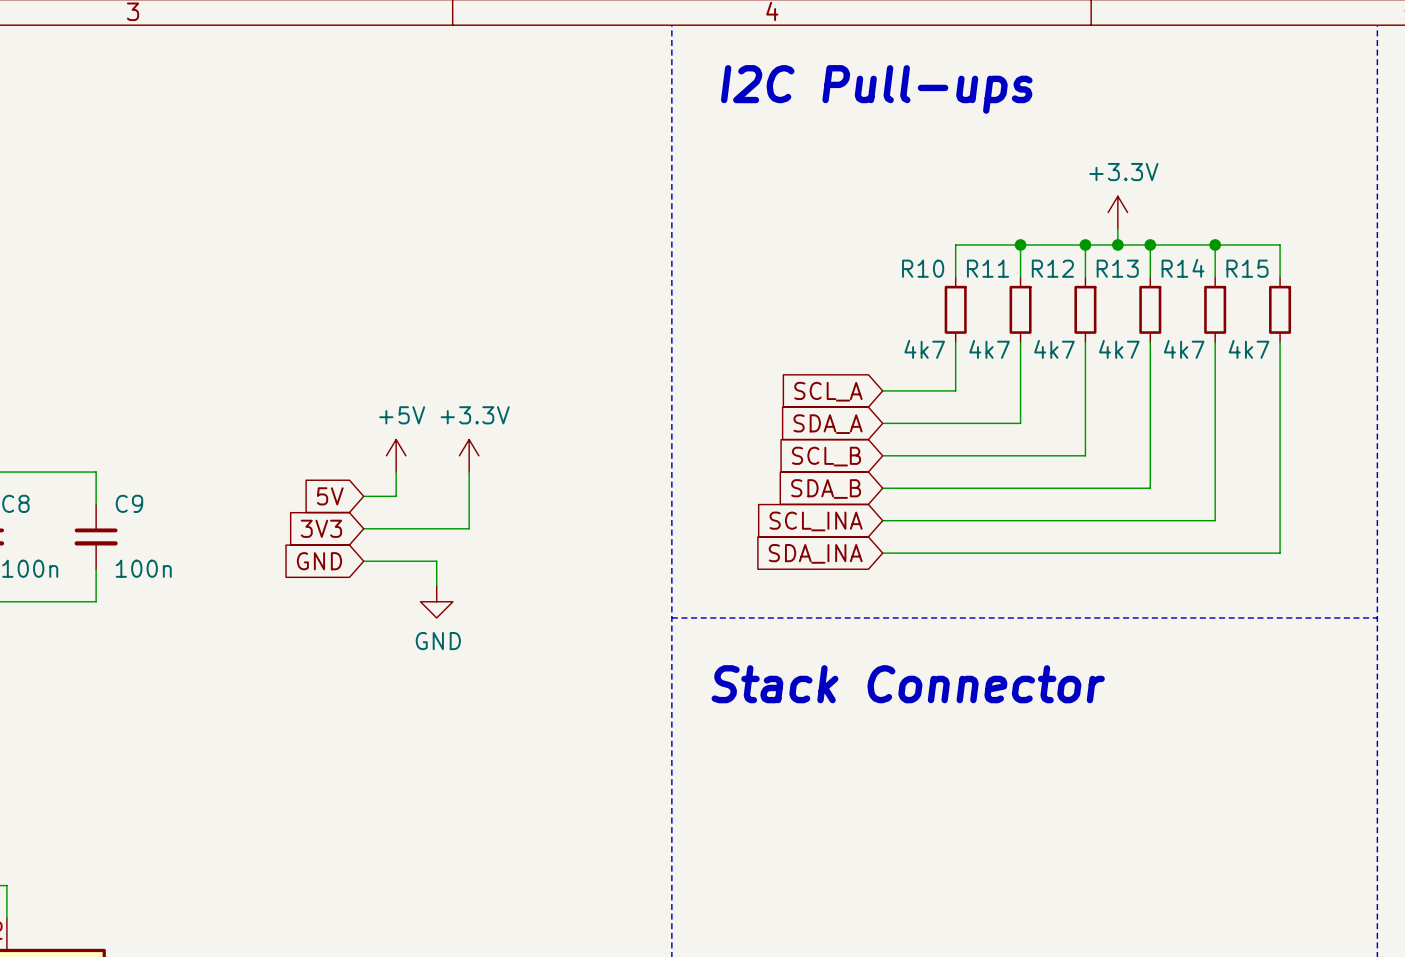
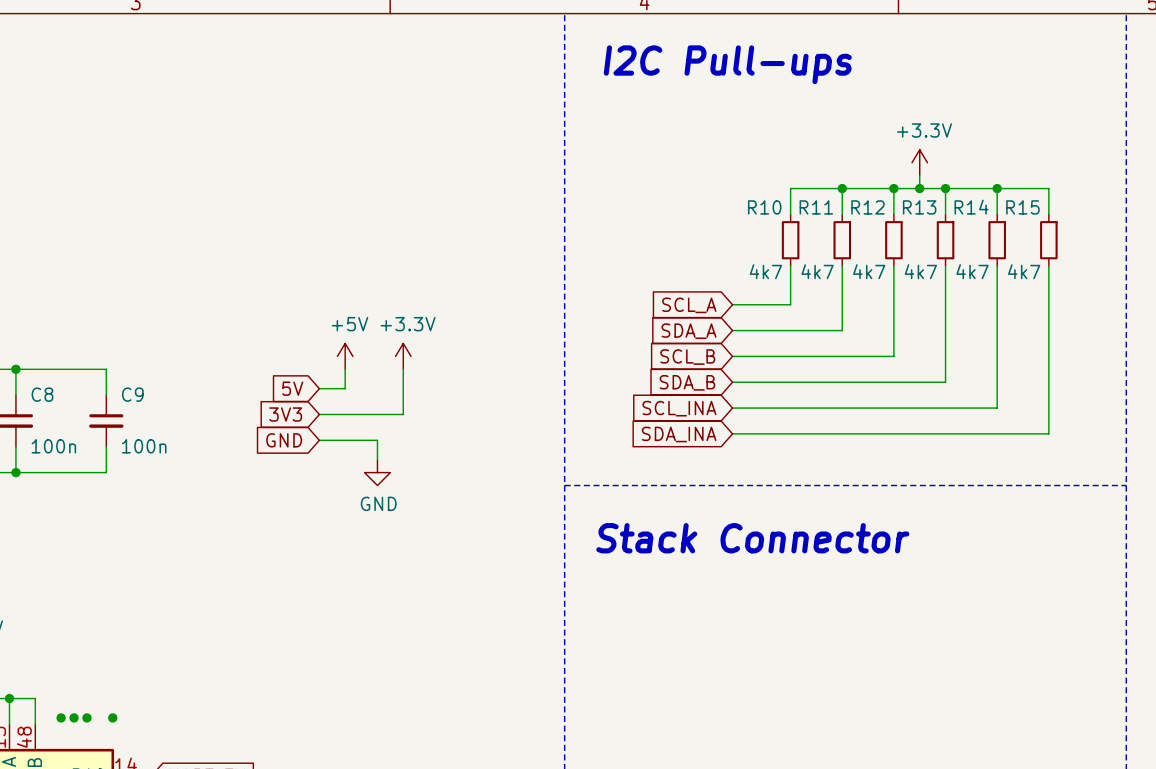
junction: none -> (61, 717)
junction: none -> (74, 717)
junction: none -> (86, 717)
junction: none -> (112, 717)

